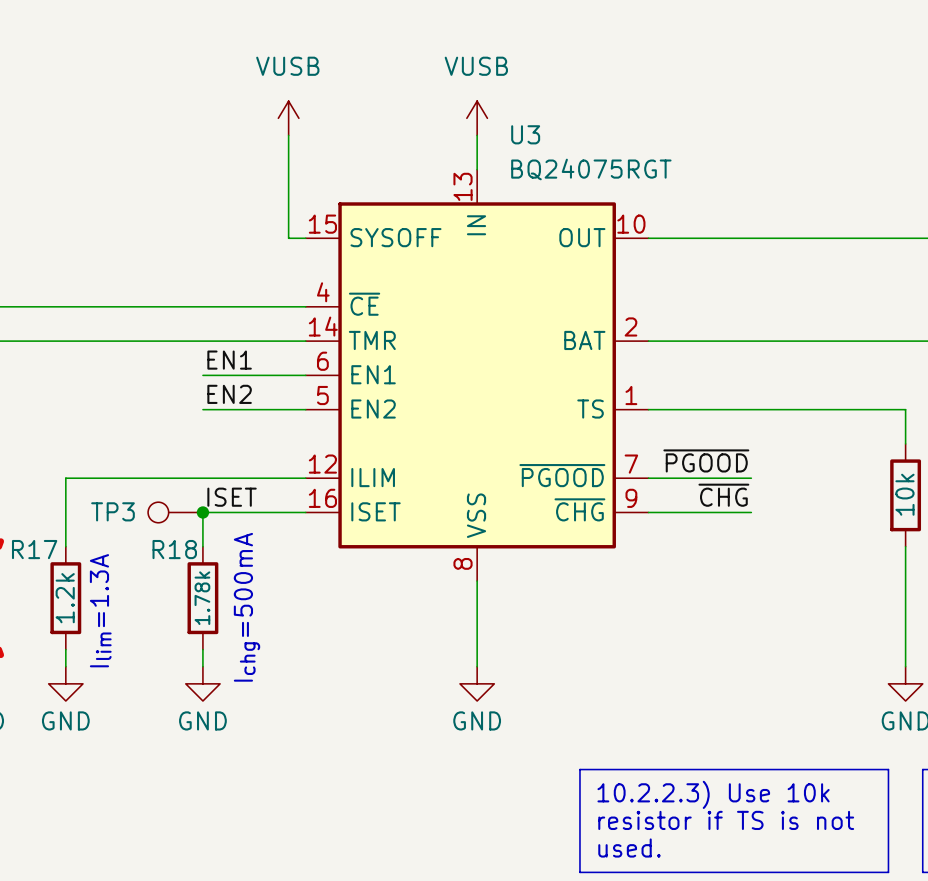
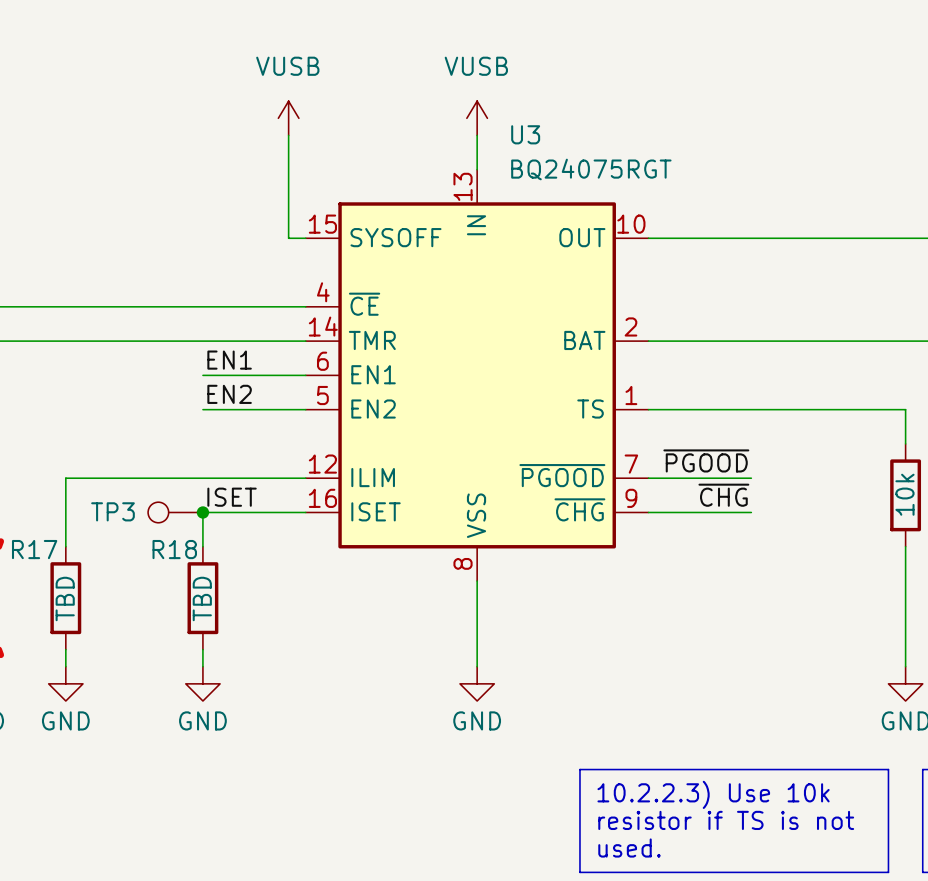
R17 value: 1.2k (65, 598) -> TBD (65, 598)
R18 value: 1.78k (202, 598) -> TBD (202, 598)
text: Ichg=500mA (247, 607) -> none
text: Ilim=1.3A (100, 610) -> none

